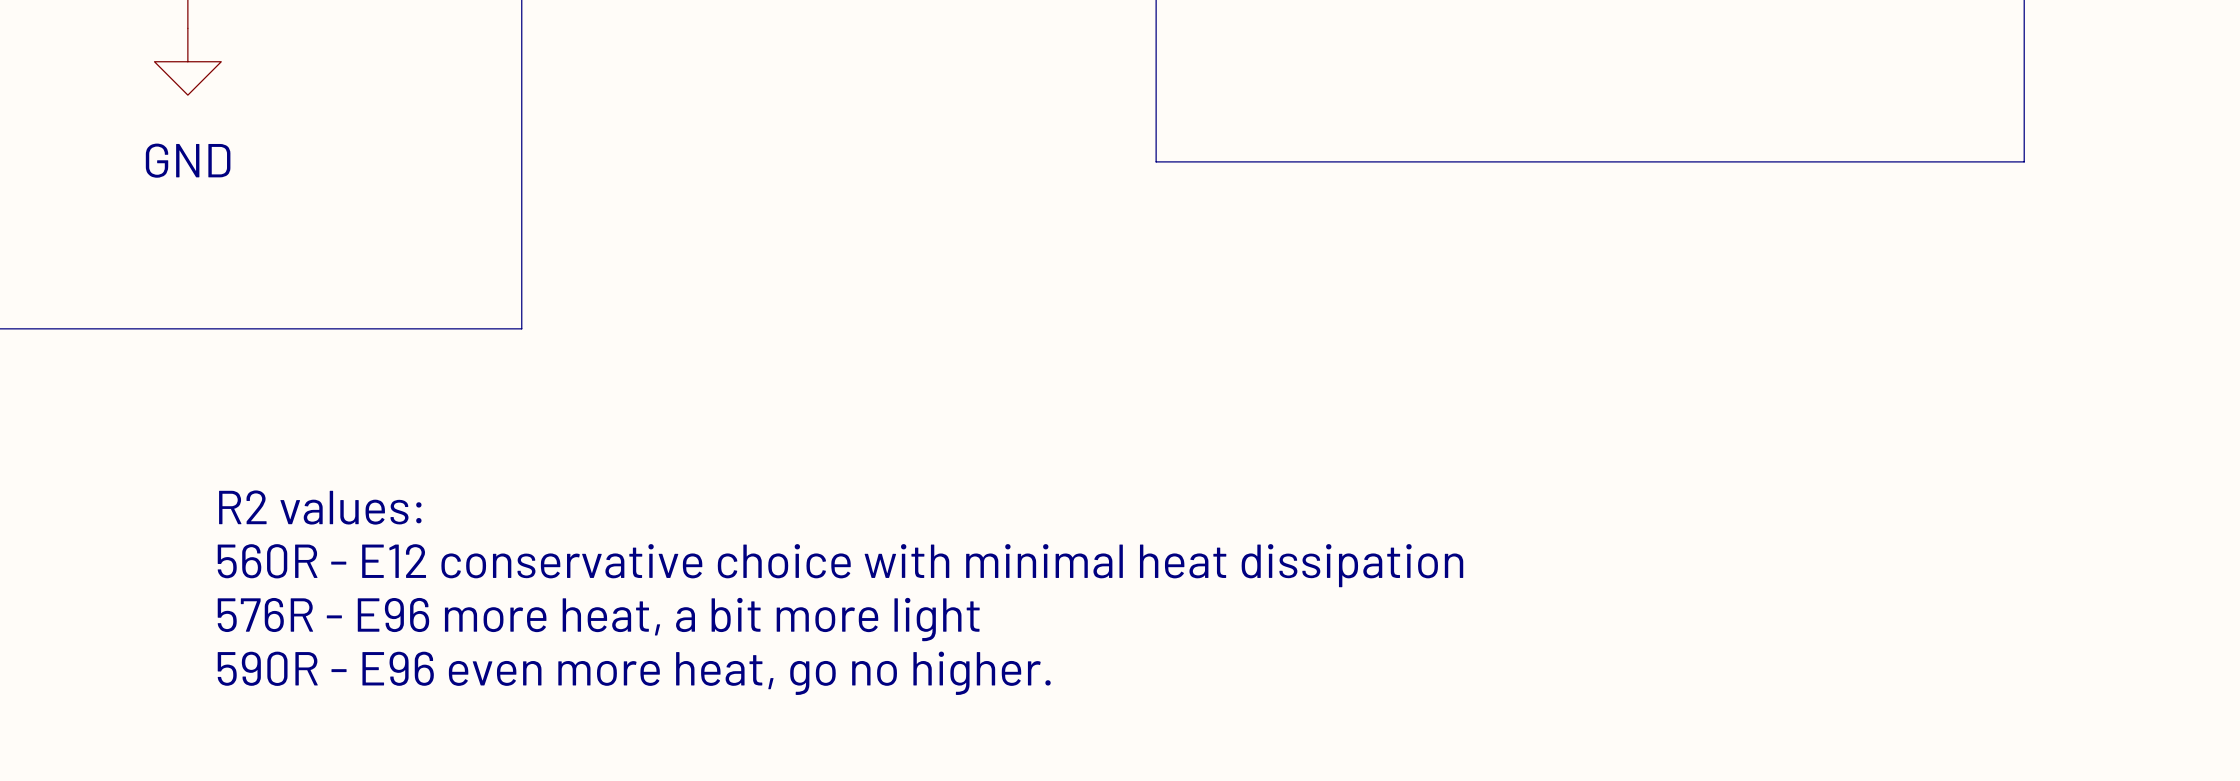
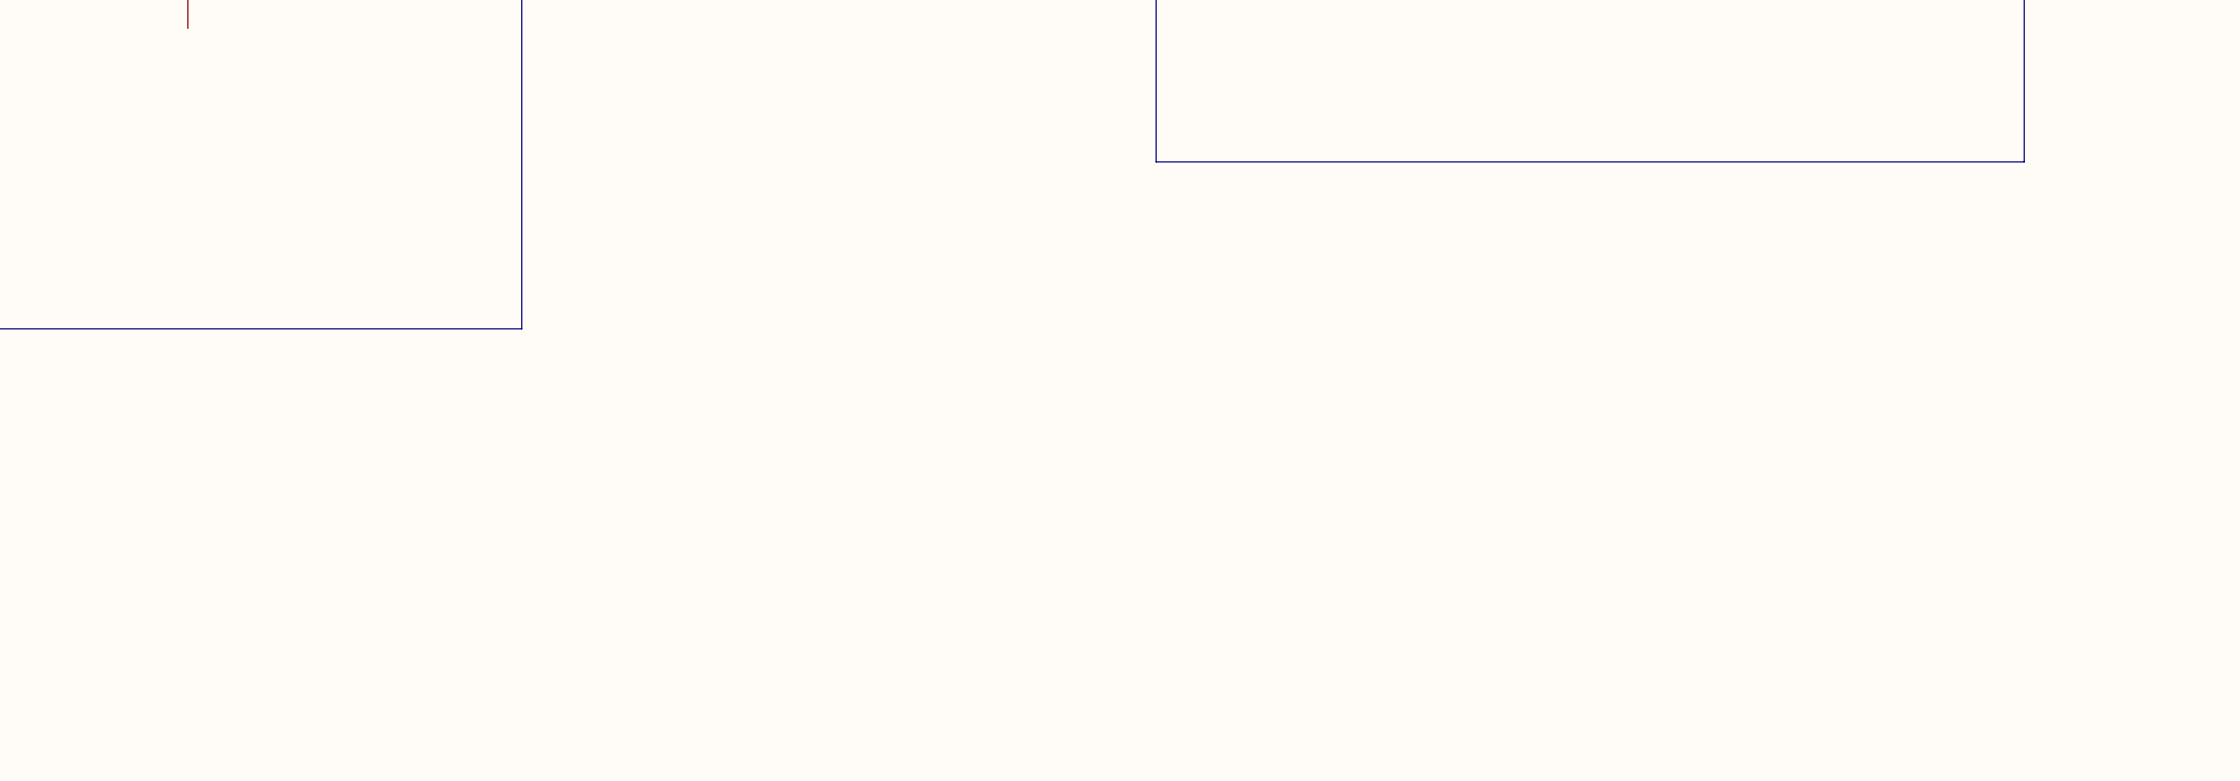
power symbol: GND (187, 61) -> none
text: R2 values: (320, 507) -> none
text: 560R - E12 conservative choice with minimal heat dissipation (840, 565) -> none
text: 576R - E96 more heat, a bit more light (598, 619) -> none
text: 590R - E96 even more heat, go no higher. (634, 673) -> none

